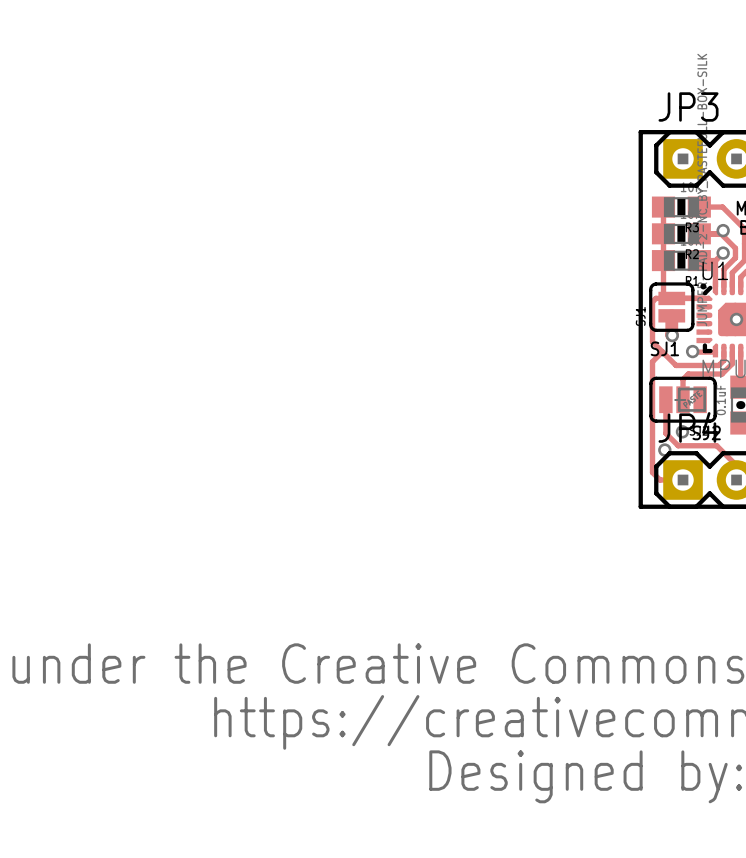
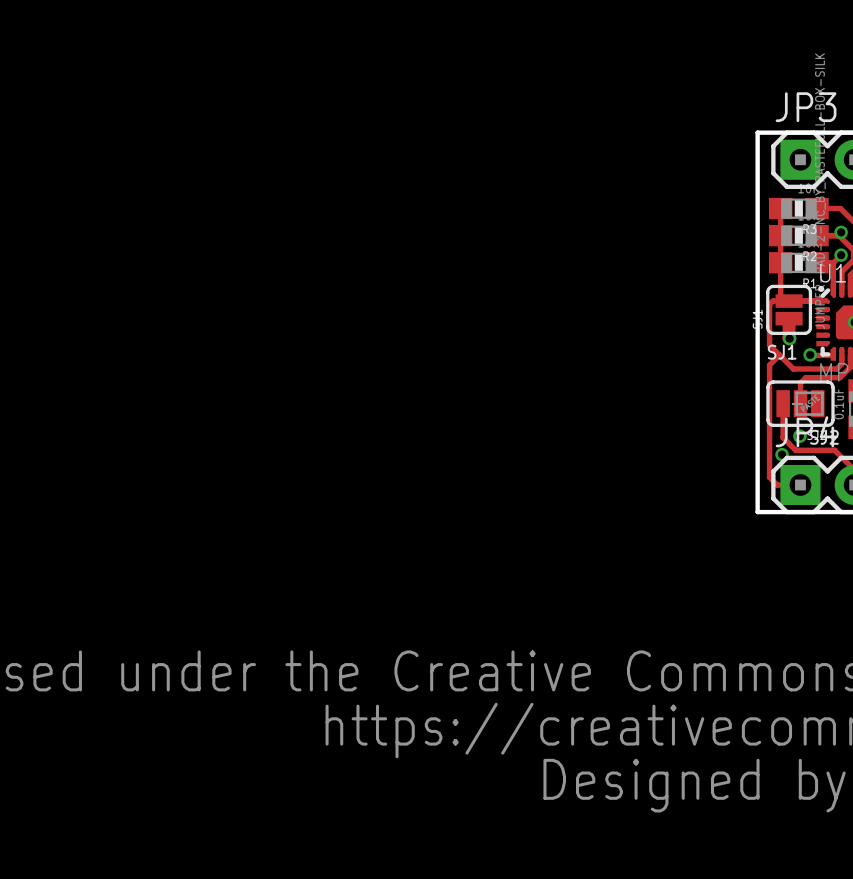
drawing: [696, 304, 700, 344] -> none

